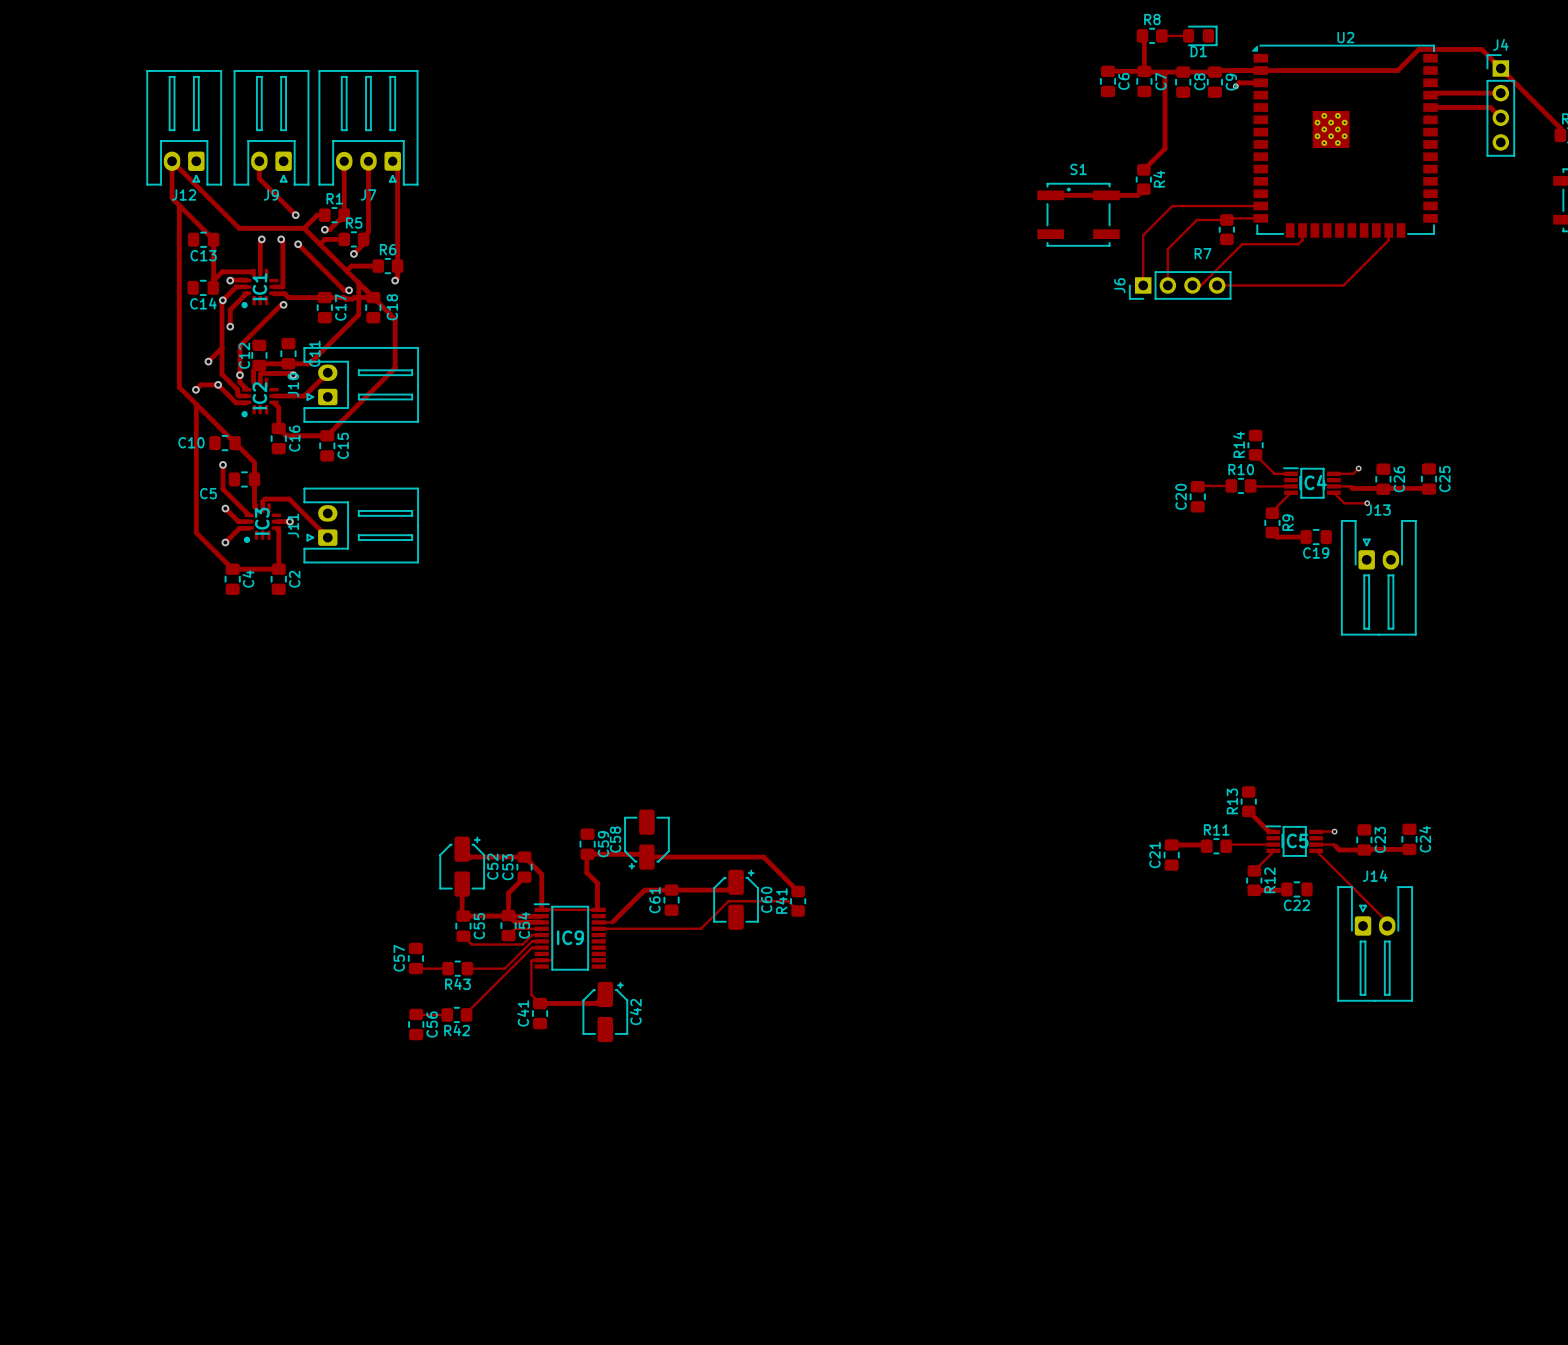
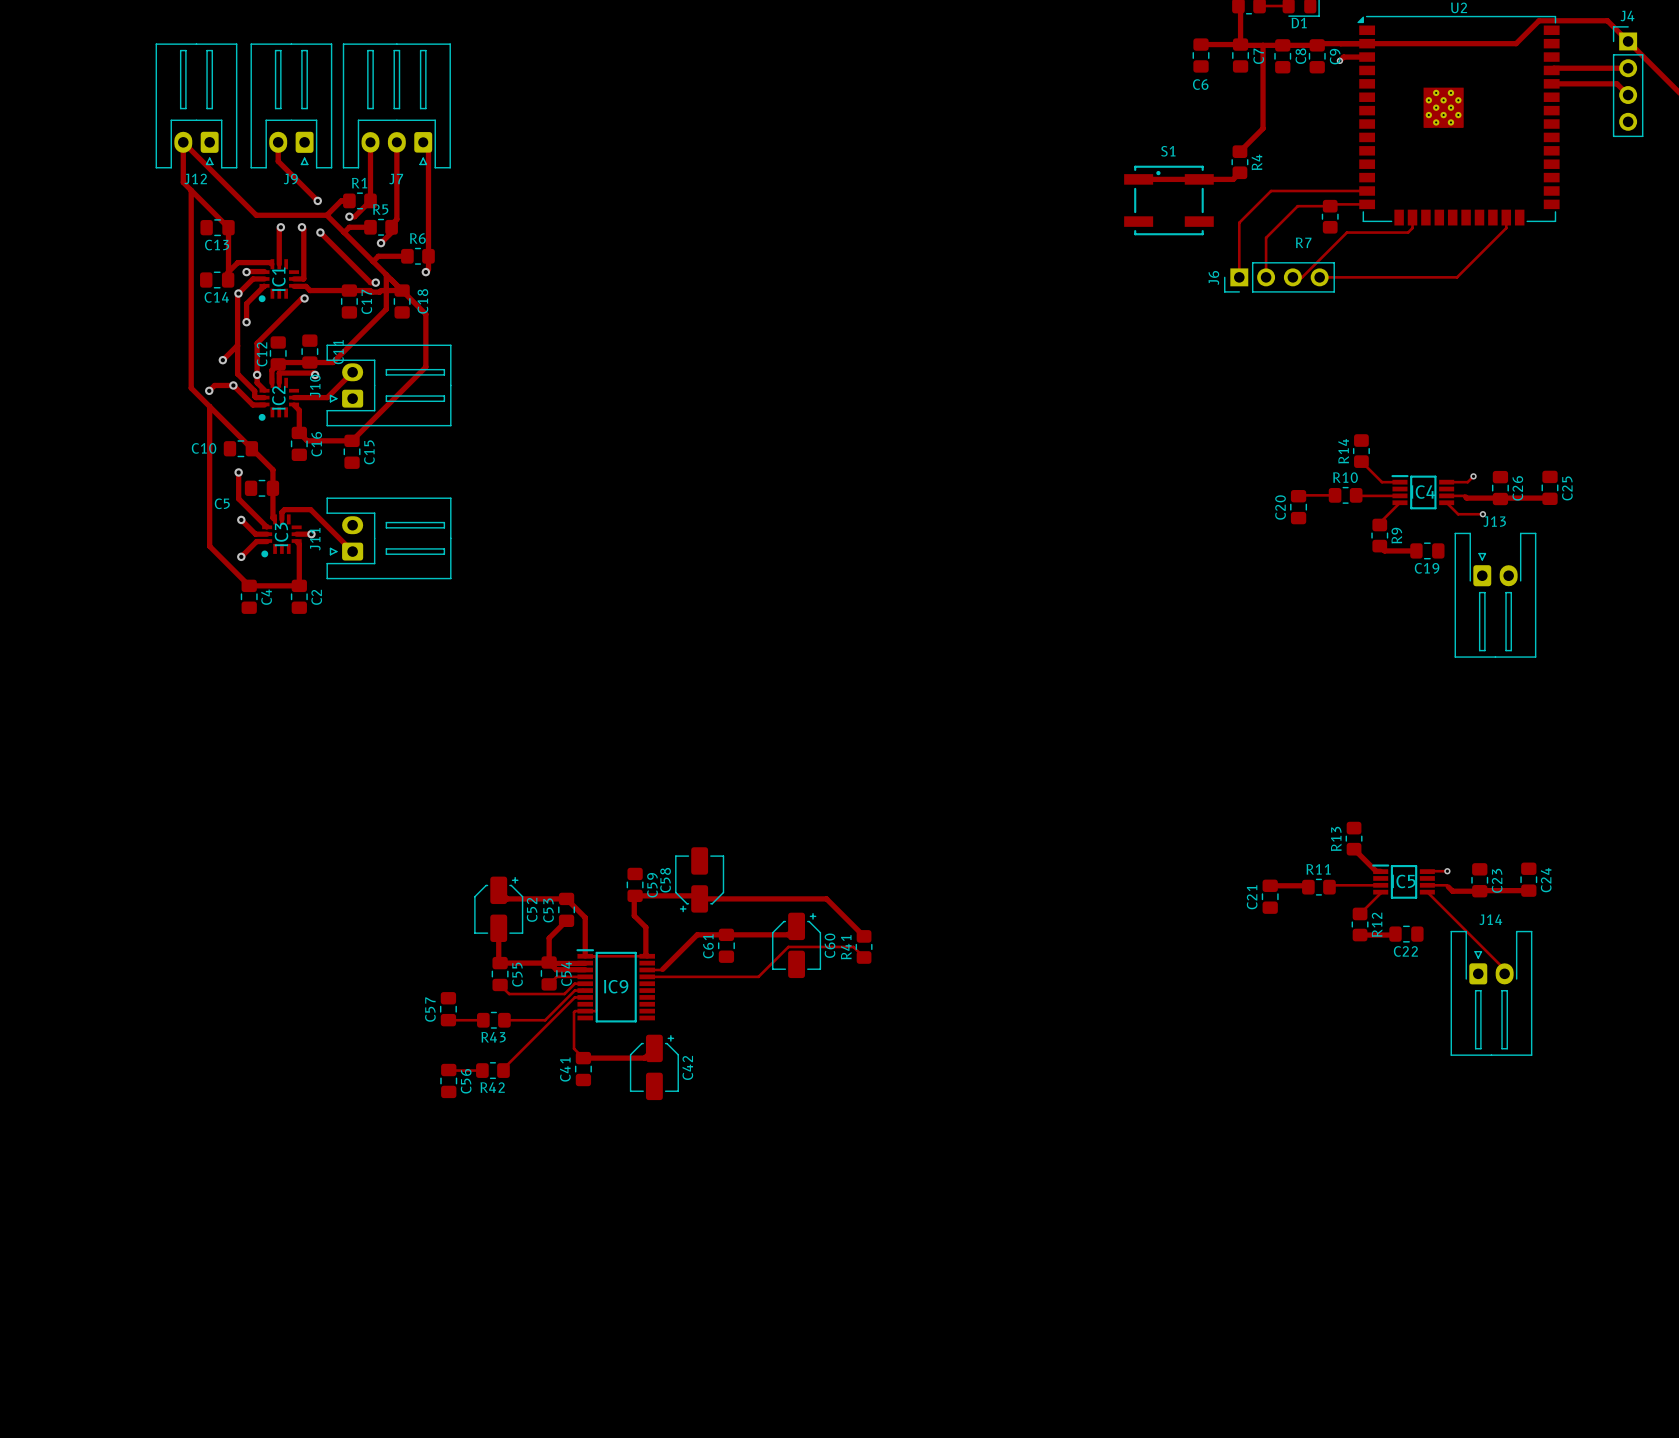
C6 name rotation: 0° (1123, 81) -> 90° clockwise (1200, 84)
C6 name position: C6 (1123, 81) -> C6 (1200, 84)

